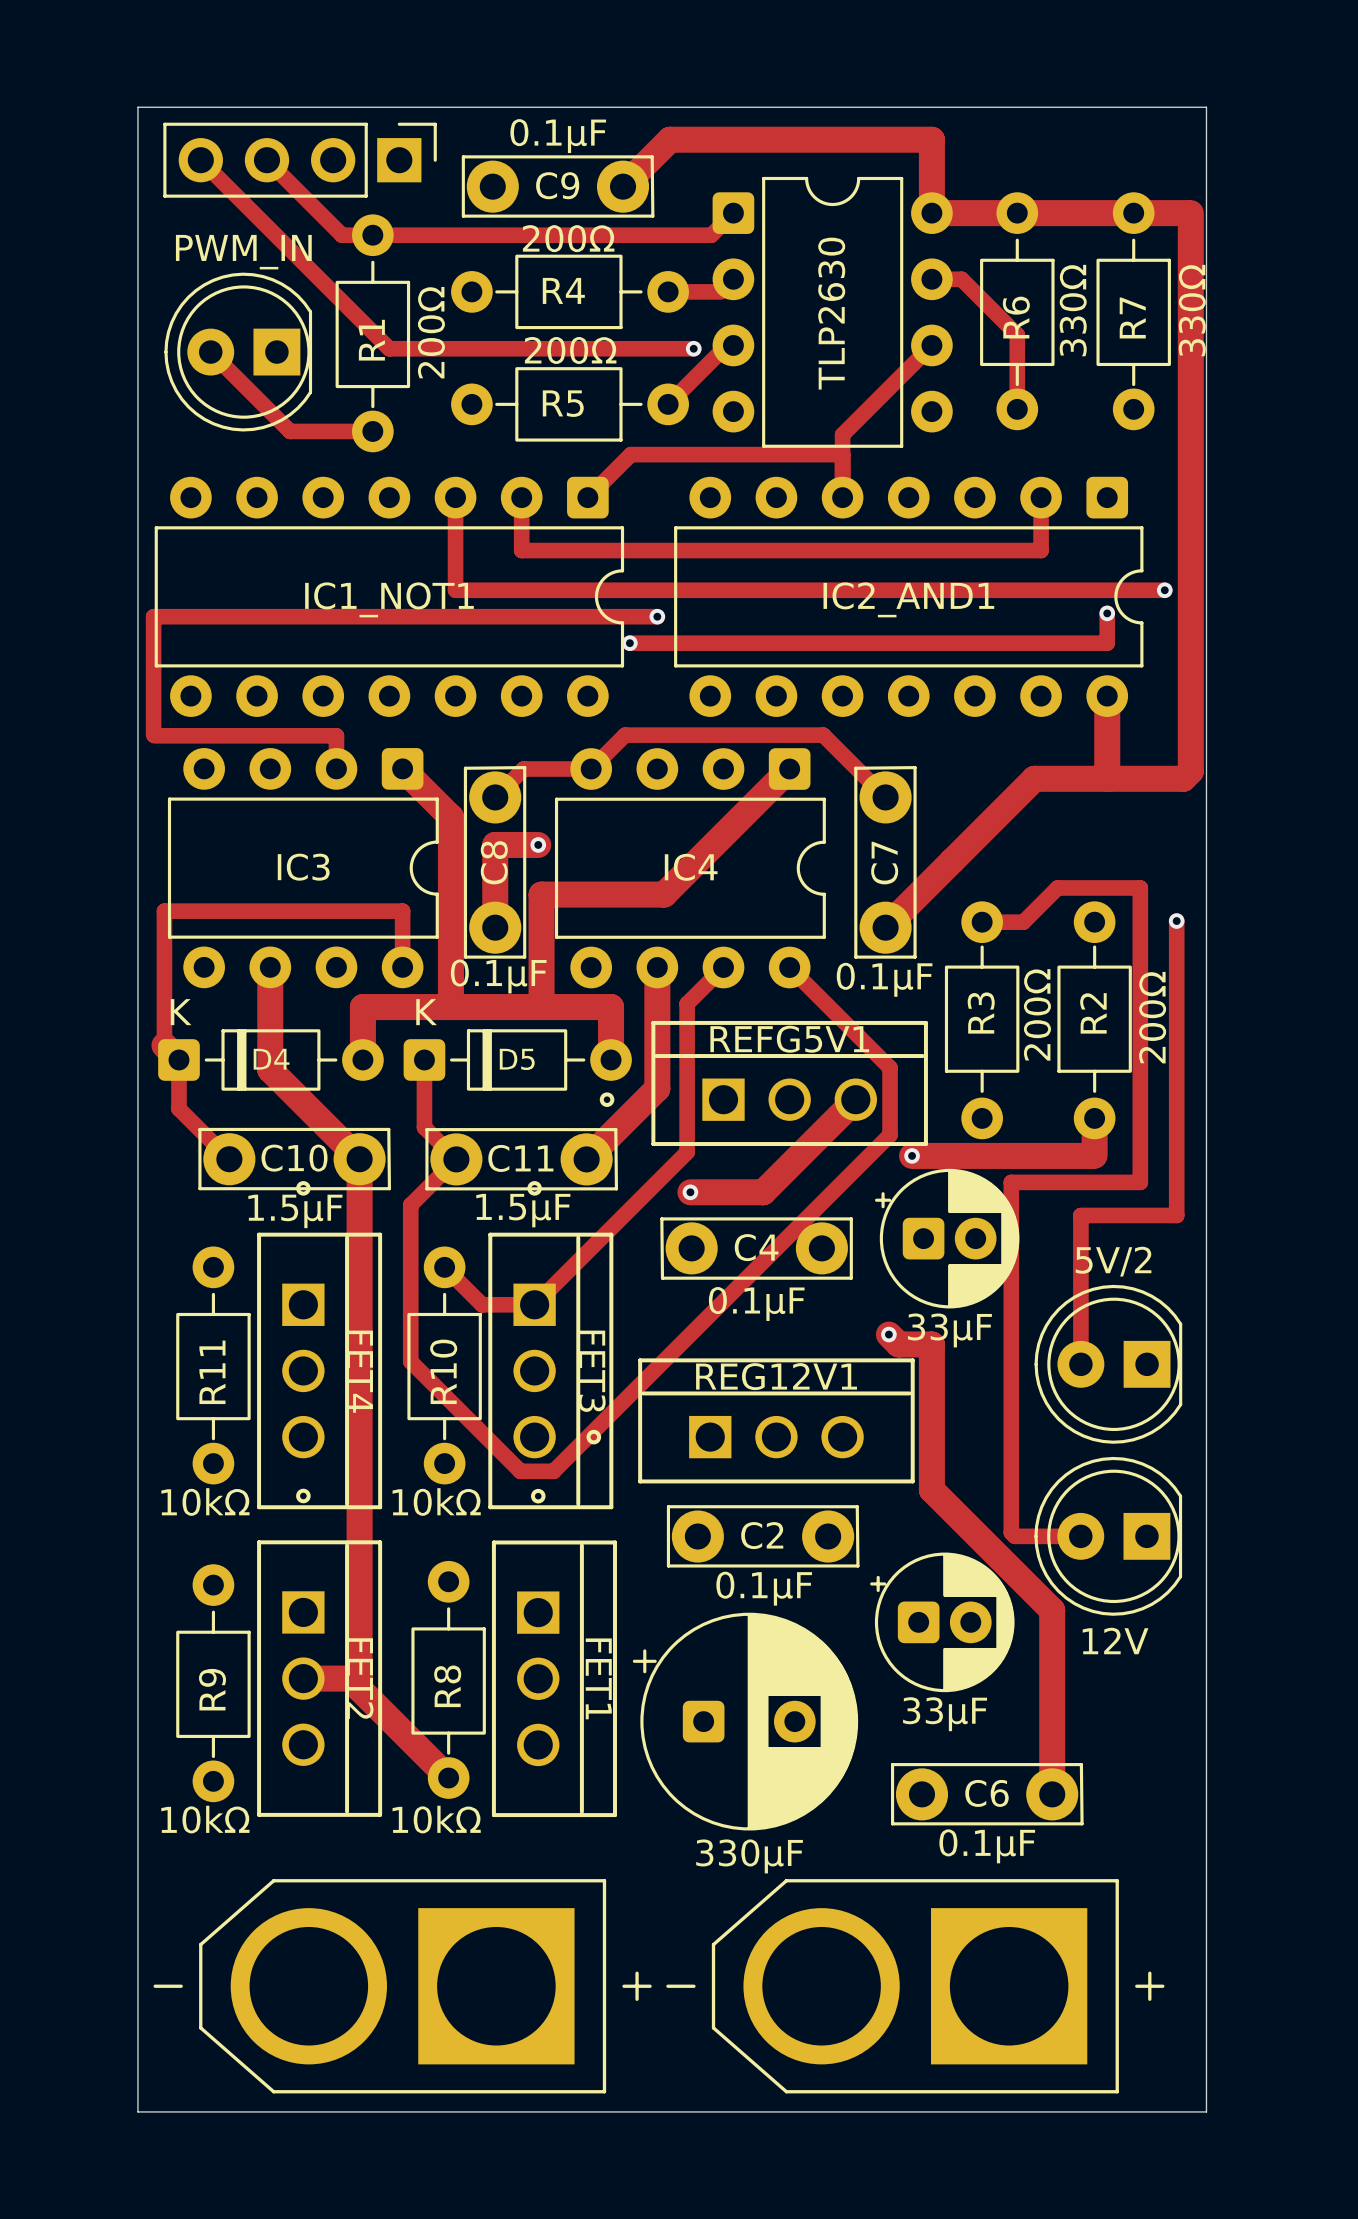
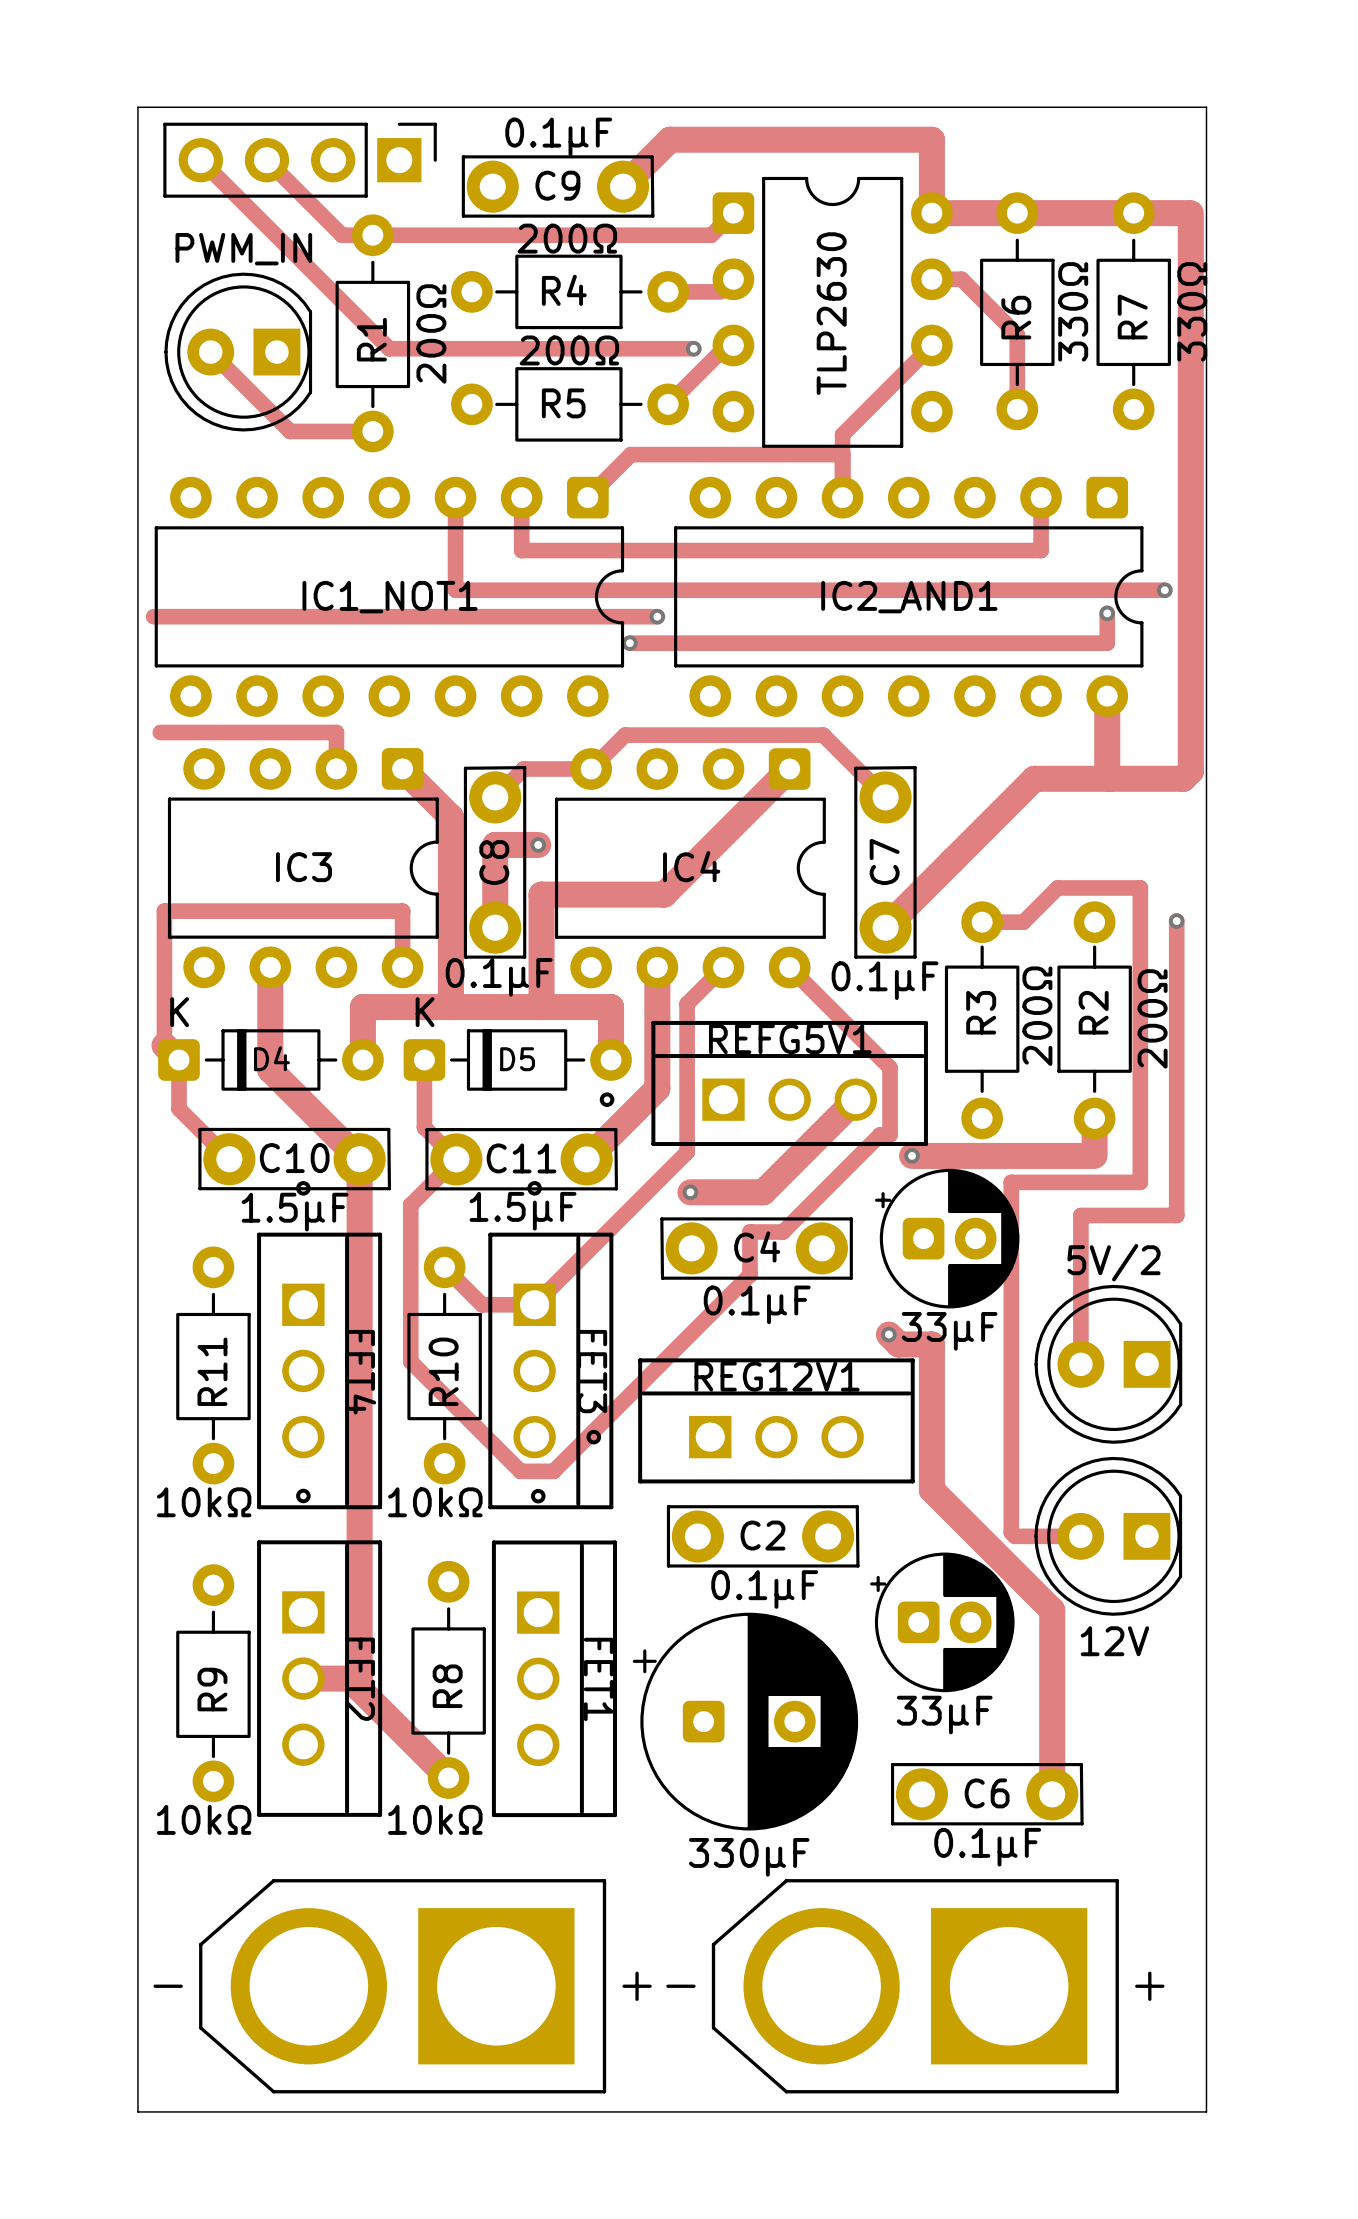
track: (153, 616) (154, 735) (336, 735) -> (160, 732) (336, 732) (336, 735)
track: (890, 1134) (749, 1275) -> (890, 1134) (880, 1134) (782, 1232) (749, 1232) (749, 1275)

